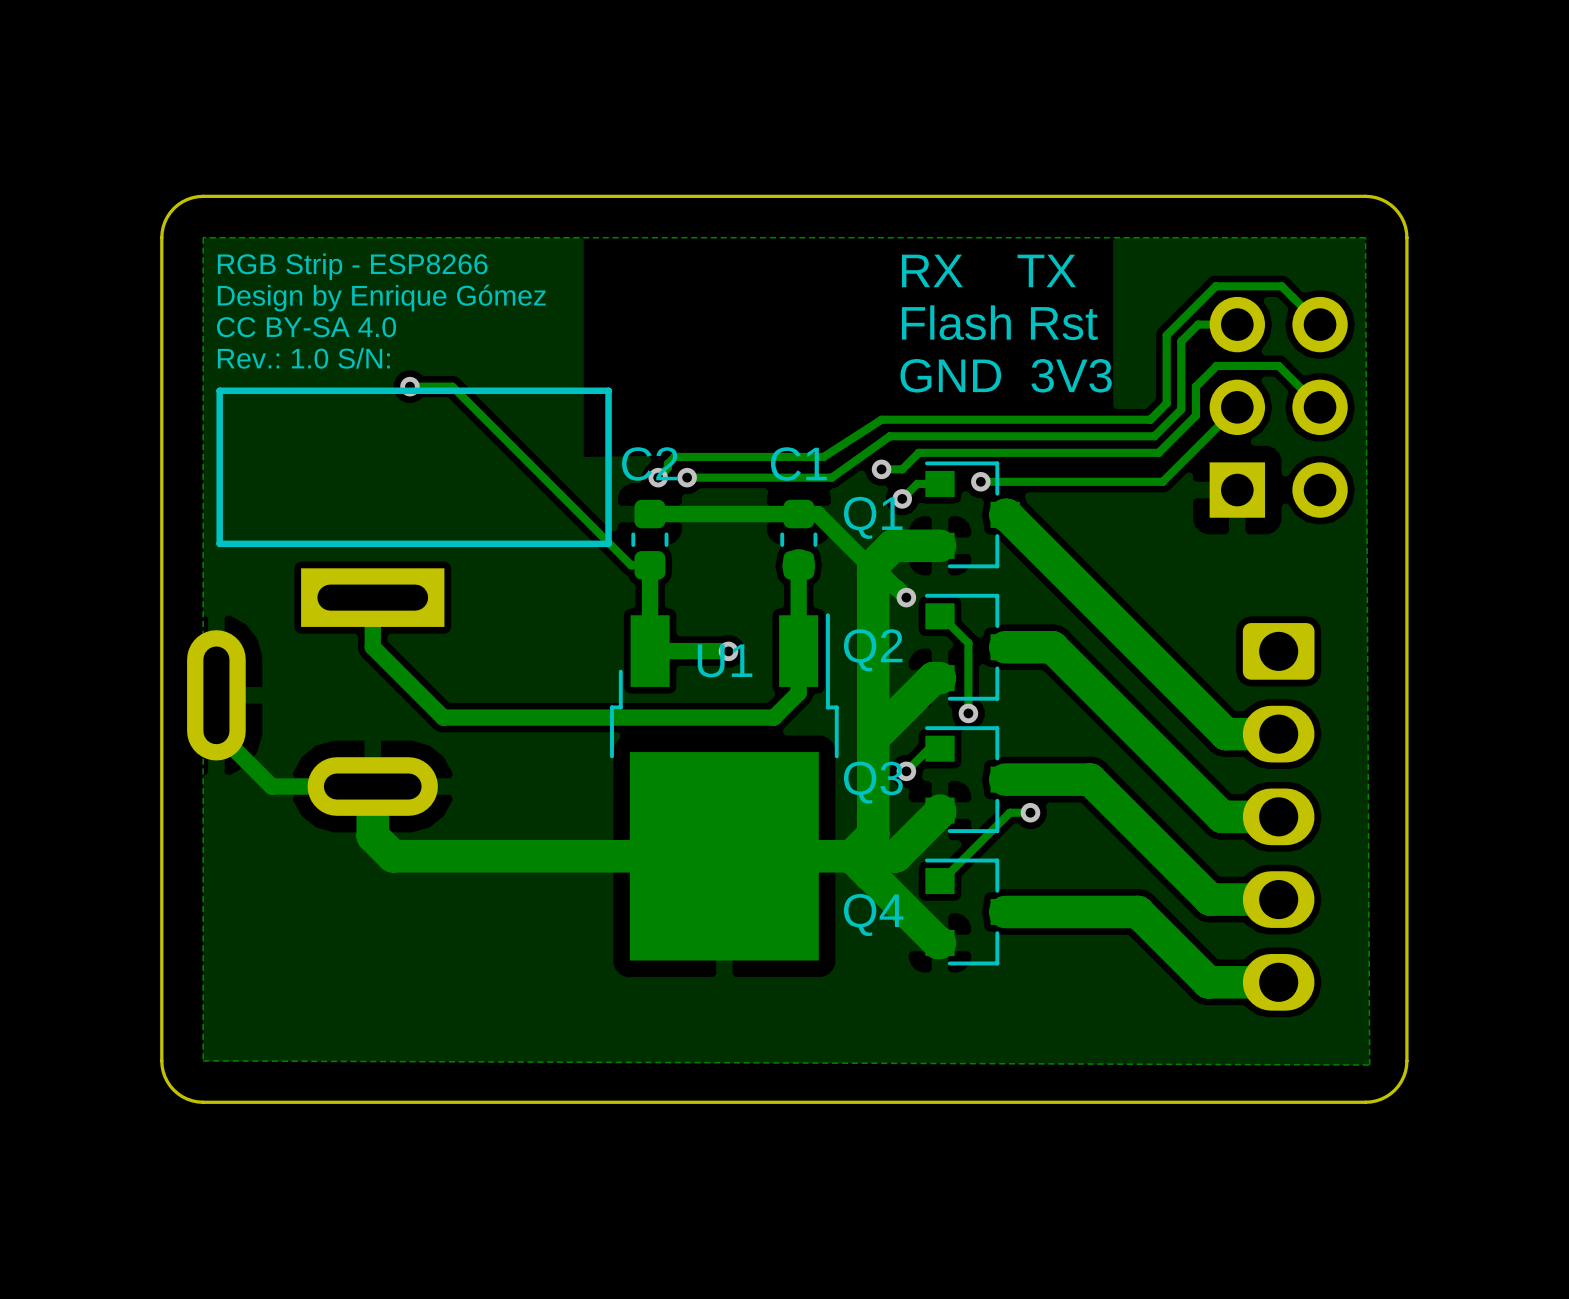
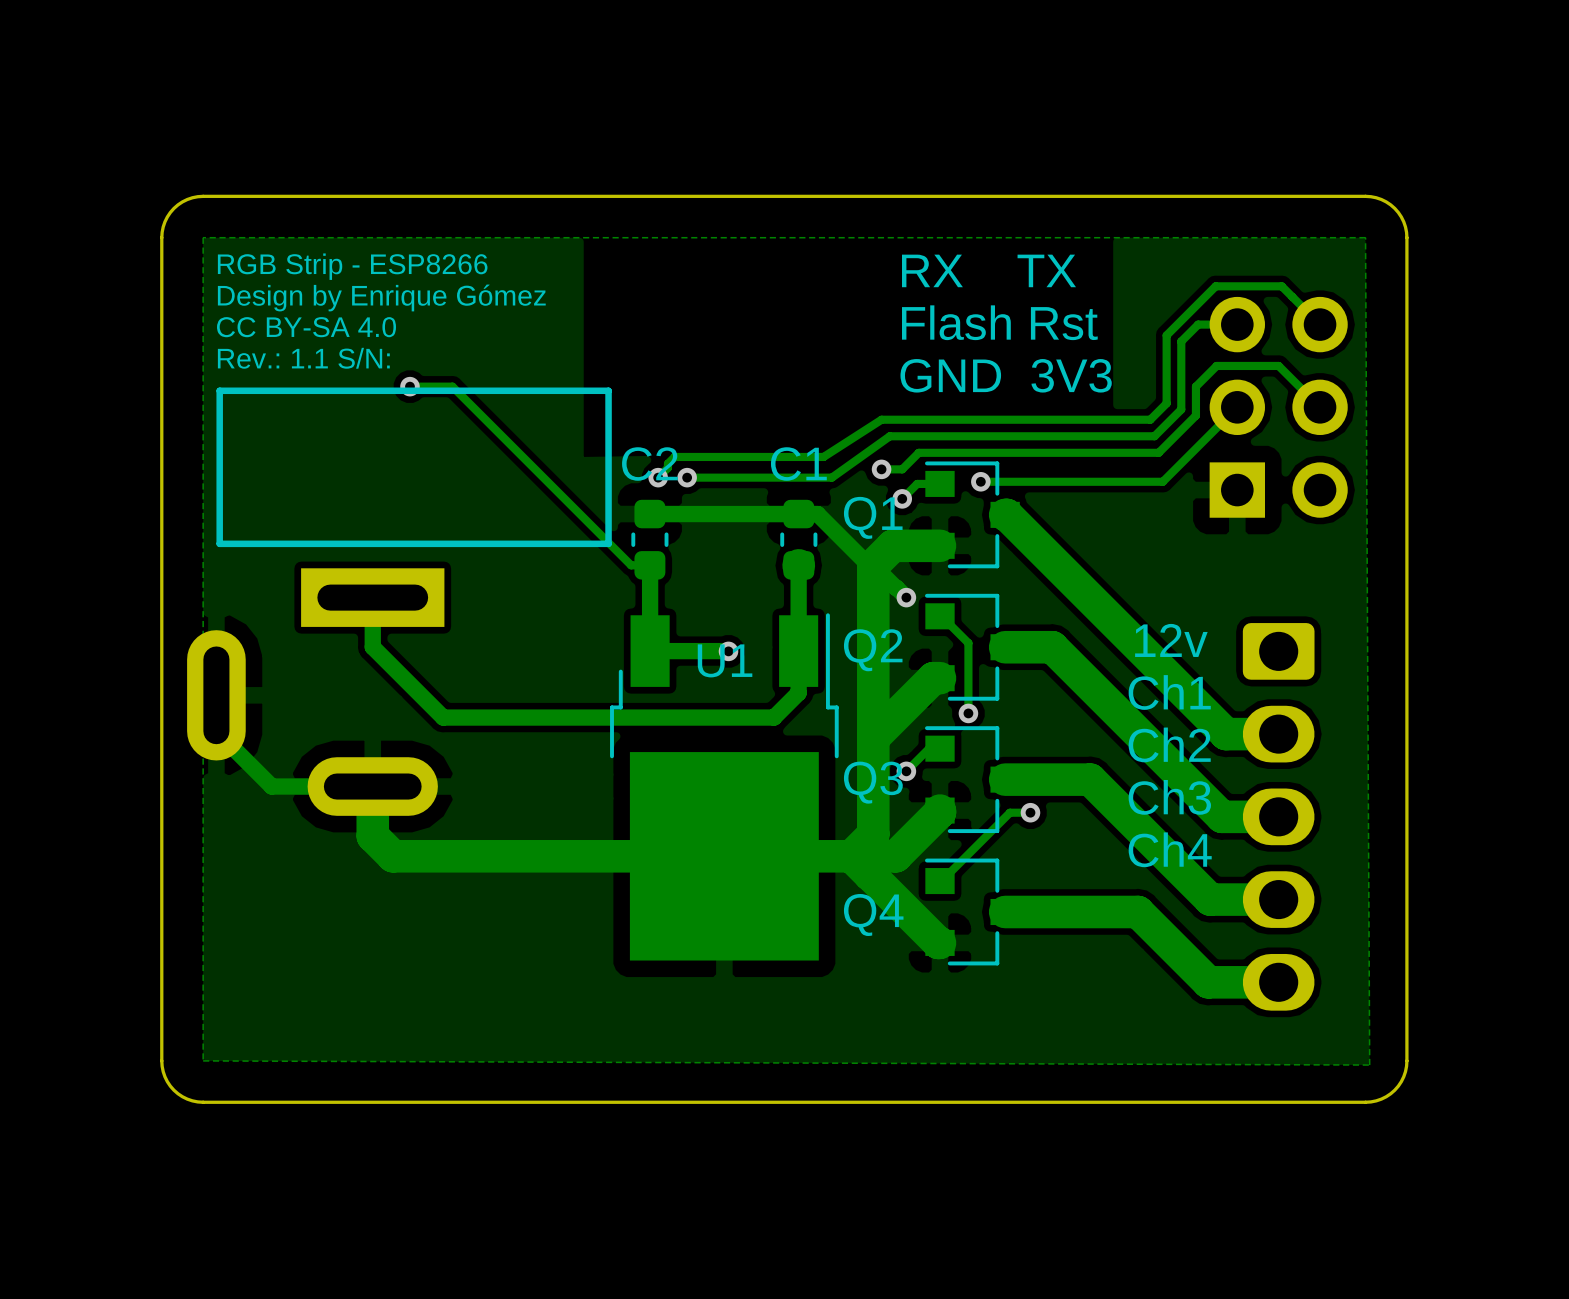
text: Rev.: 1.0 S/N: (303, 358) -> Rev.: 1.1 S/N: (303, 358)
text: none -> 12v (1171, 640)
text: none -> Ch1 (1169, 692)
text: none -> Ch2 (1169, 744)
text: none -> Ch3 (1169, 797)
text: none -> Ch4 (1170, 849)

